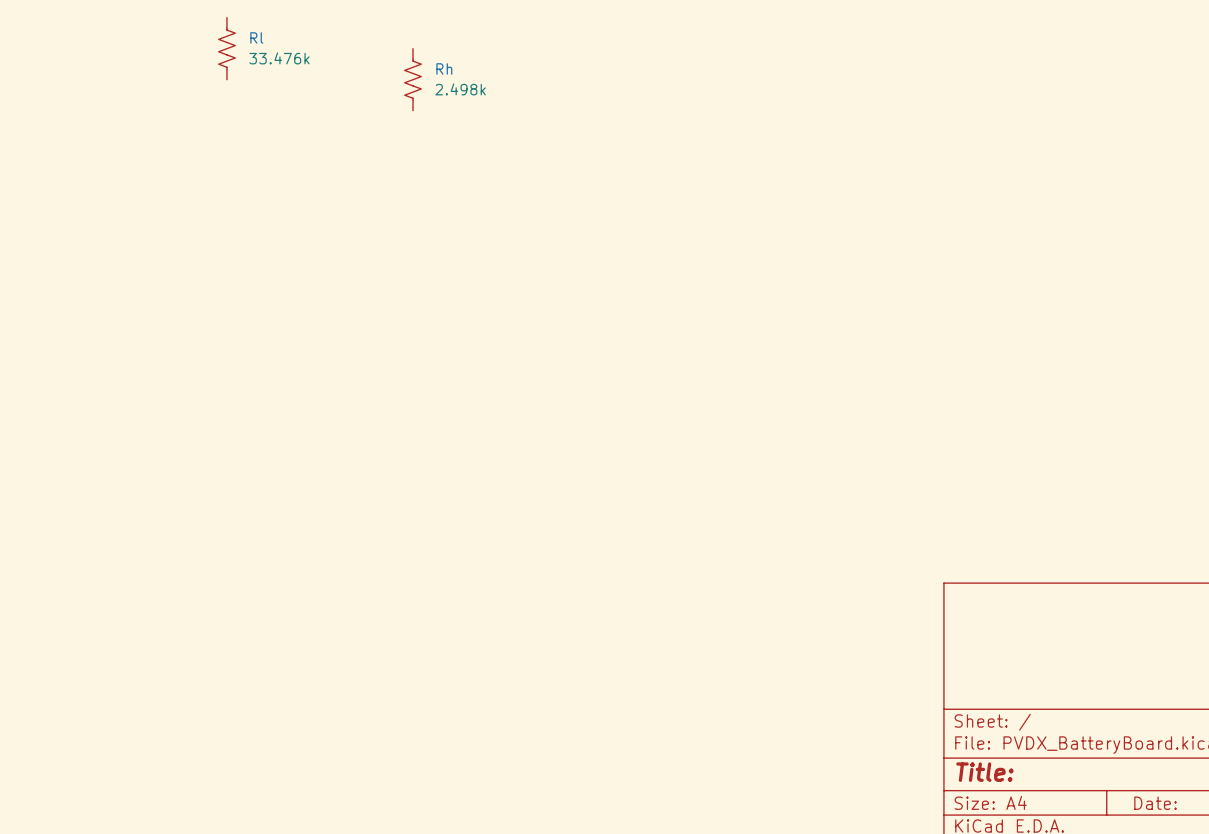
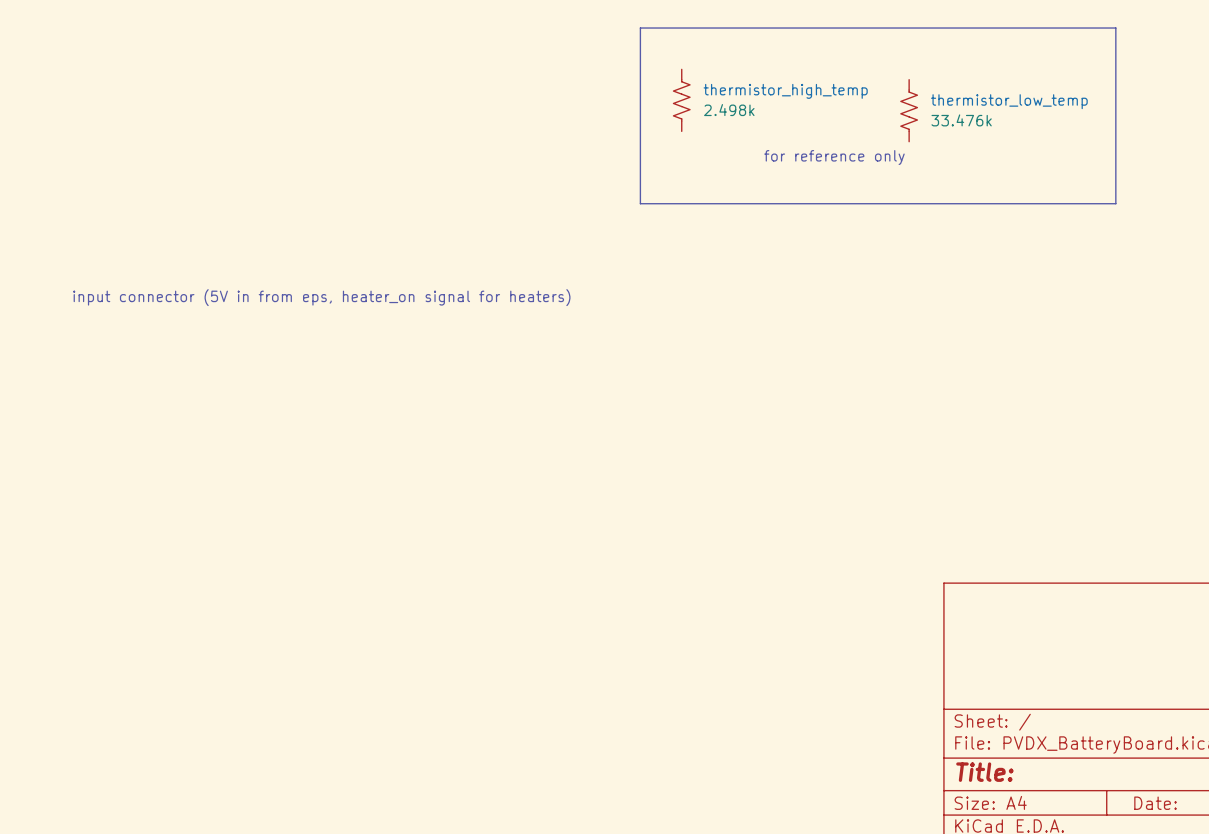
line: none -> (640, 28) (1115, 28) (1115, 203) (640, 203) (640, 28)
Rl: 33.476k (226, 48) -> none
Rh: 2.498k (413, 79) -> none
thermistor_high_temp: none -> 2.498k (681, 100)
thermistor_low_temp: none -> 33.476k (909, 110)
text: none -> for reference only (834, 157)
text: none -> input connector (5V in from eps, heater_on signal for heaters) (321, 297)

